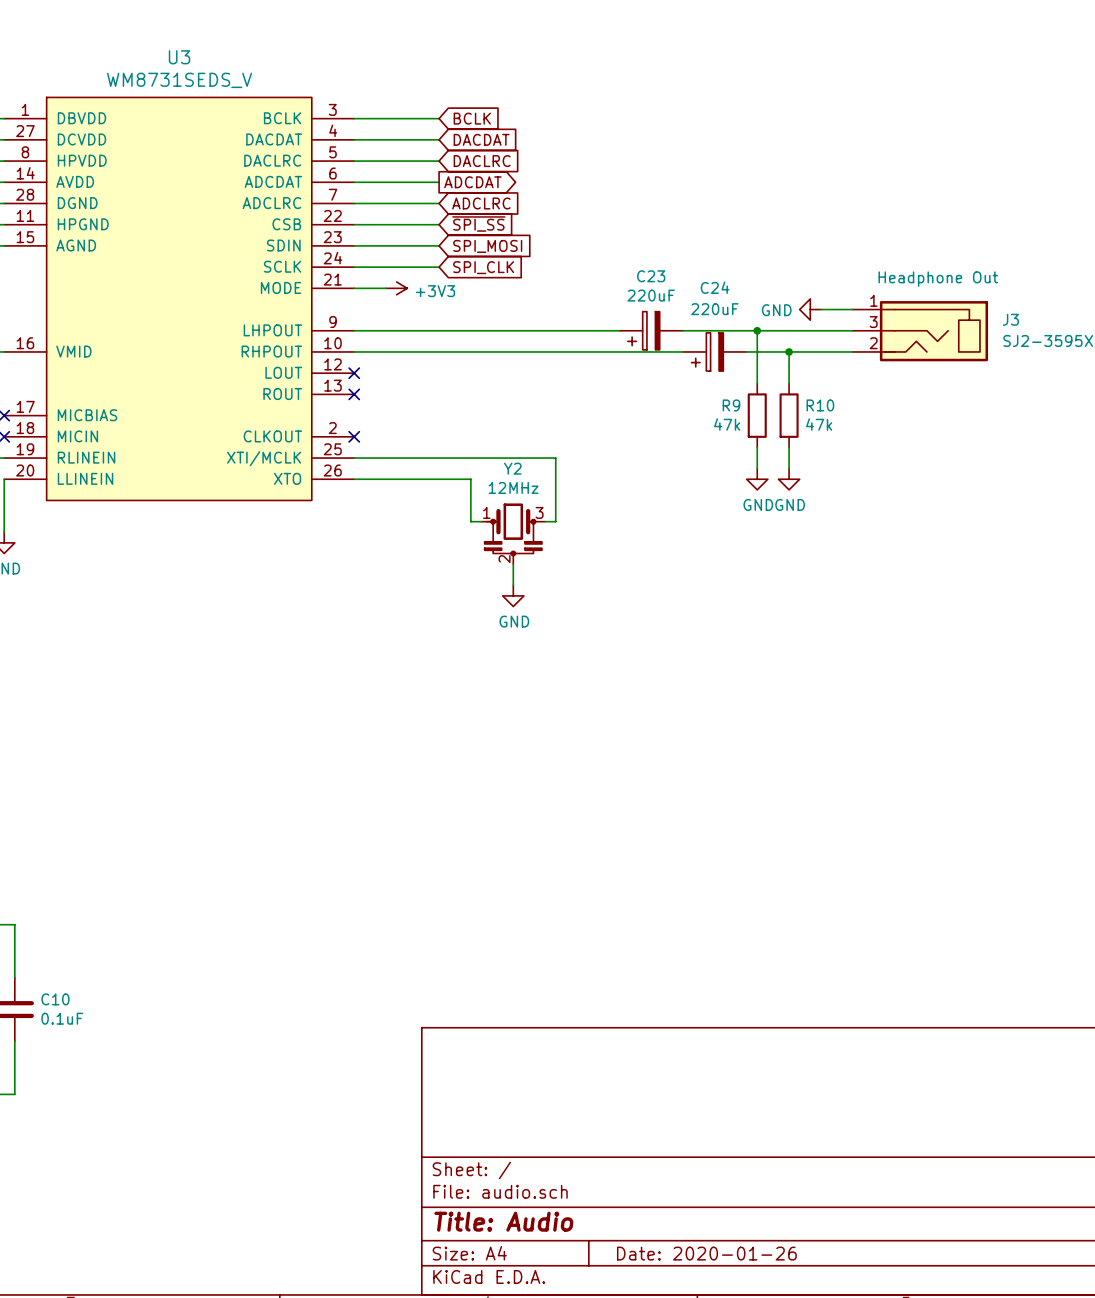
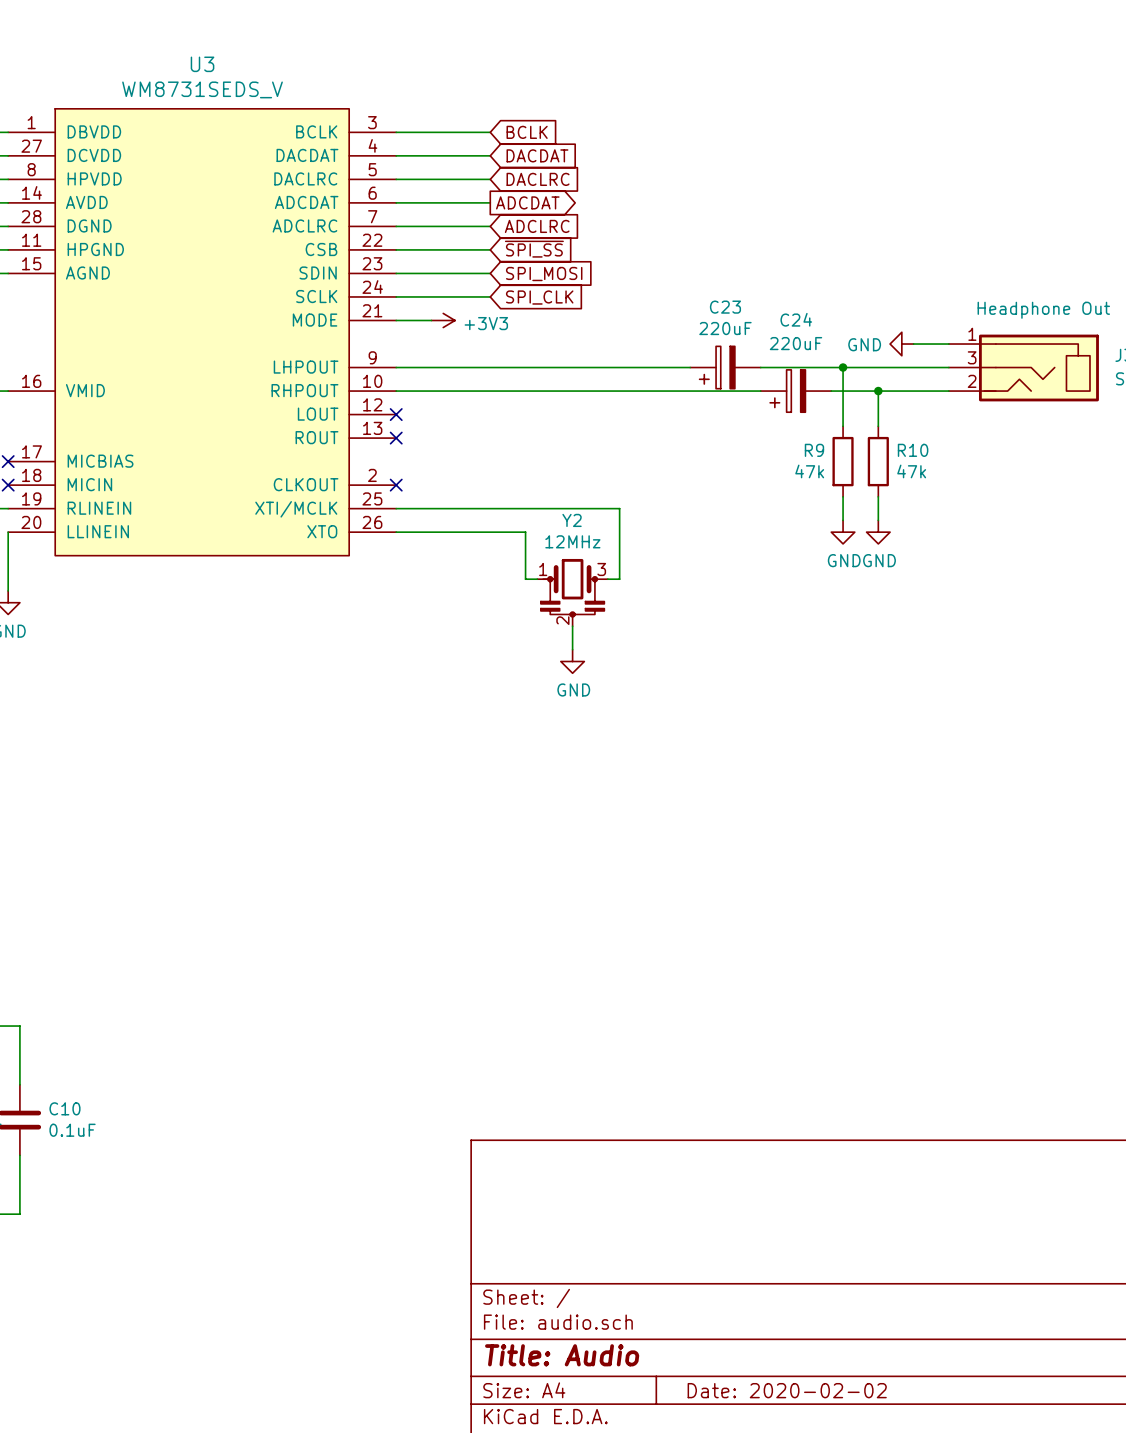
title block: Date: 2020-01-26 (706, 1253) -> Date: 2020-02-02 (787, 1390)

